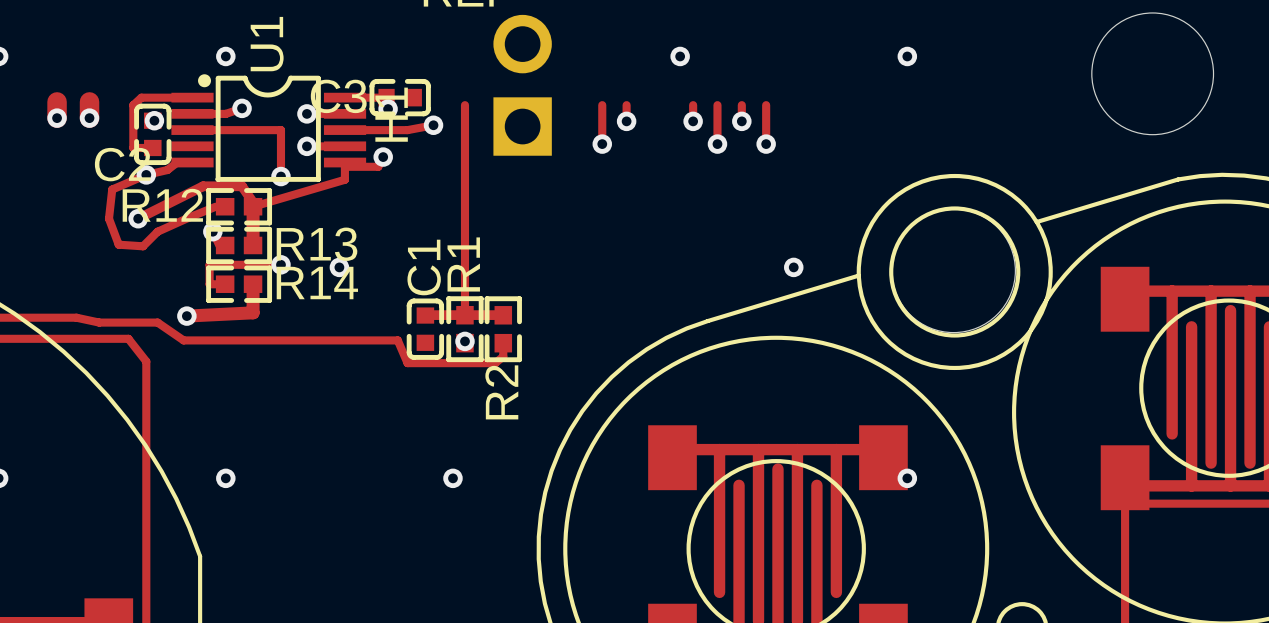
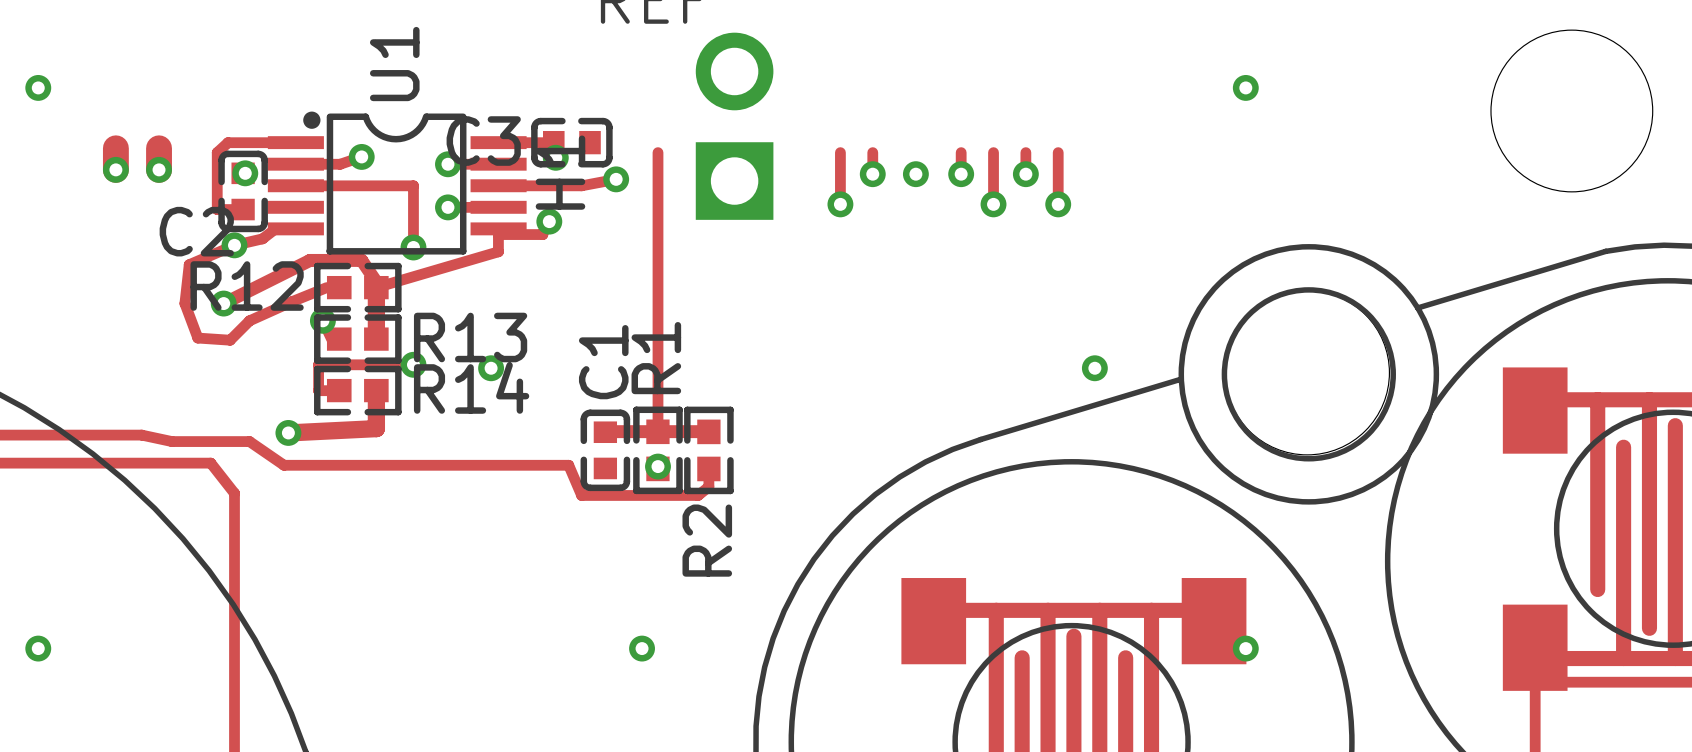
via: (225, 56) -> none
via position: (680, 56) -> (915, 174)
via: (225, 478) -> none

